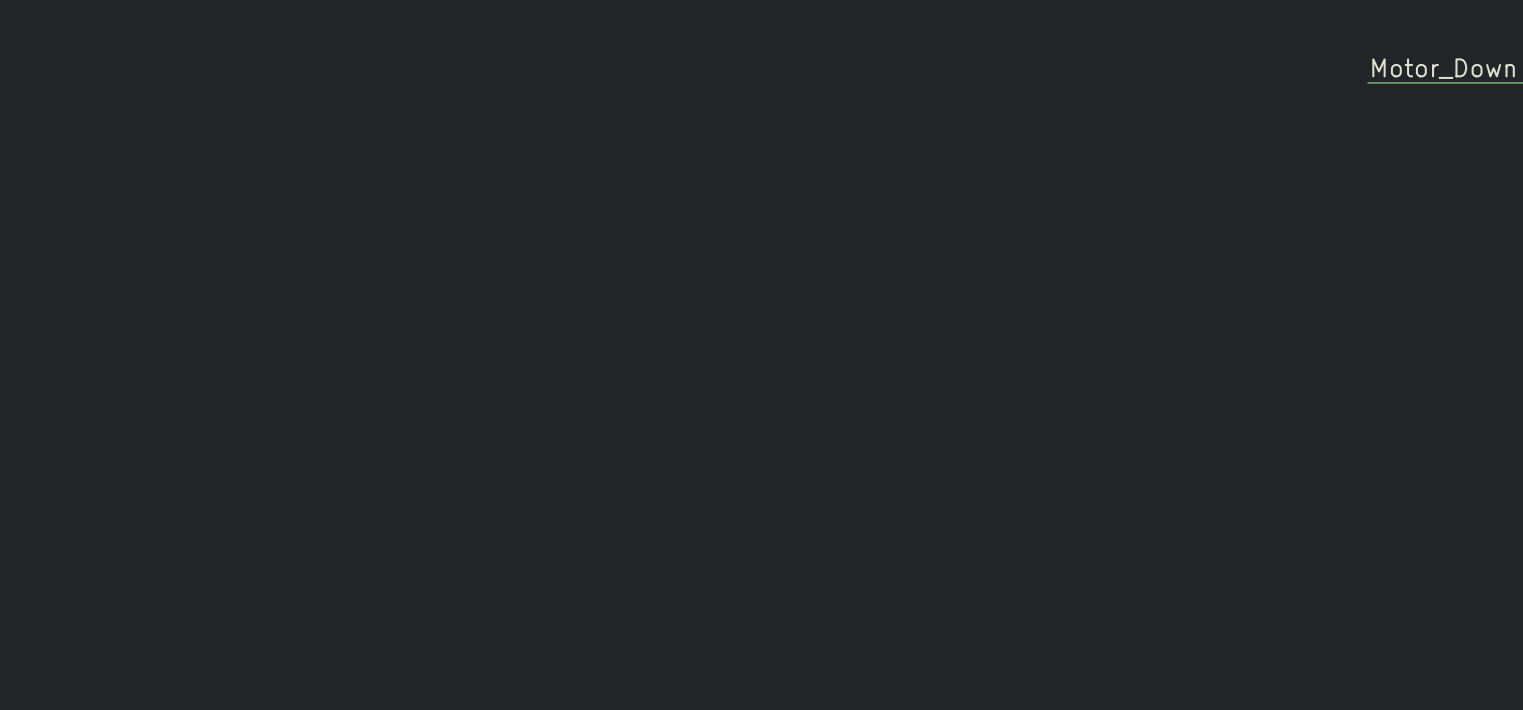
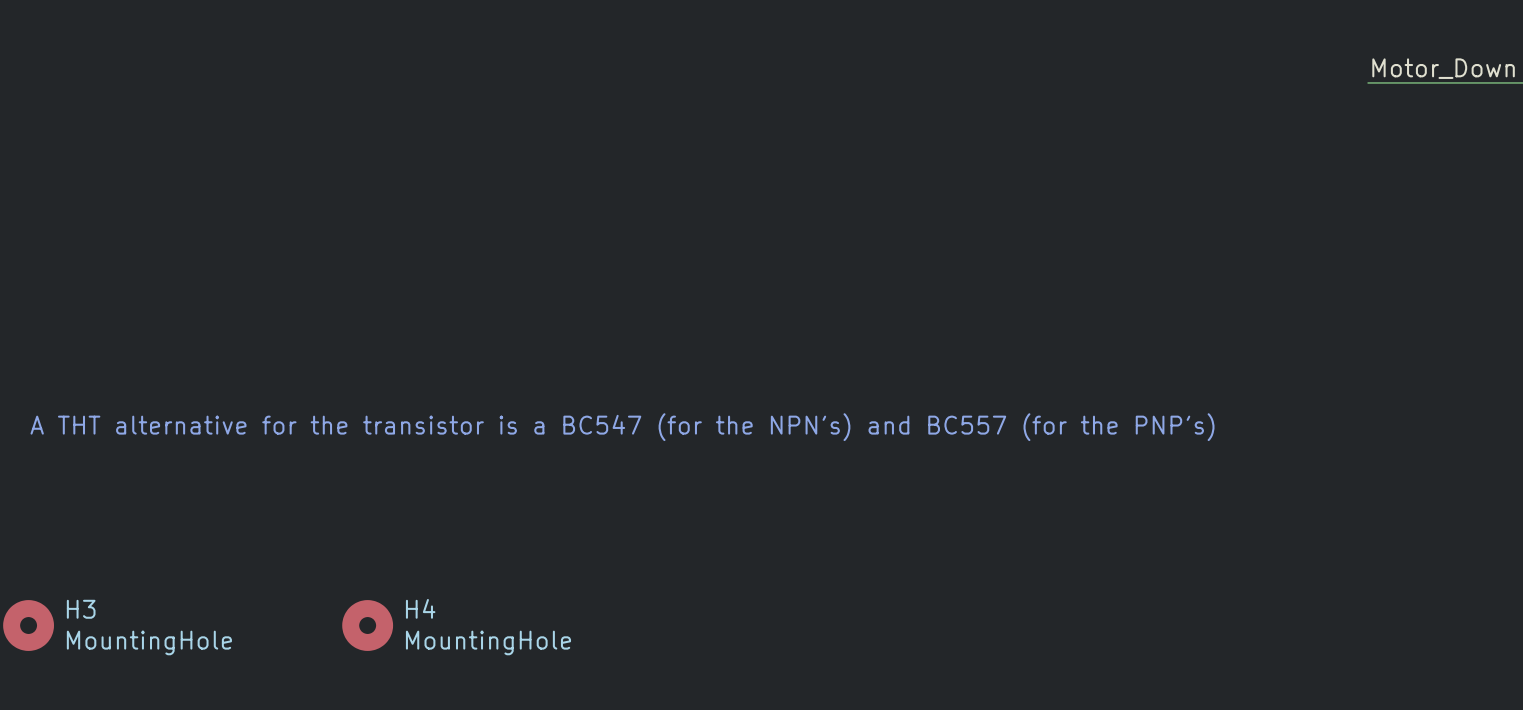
text: none -> A THT alternative for the transistor is a BC547 (for the NPN's) and BC557 (for the PNP's) (622, 427)
H3: none -> MountingHole (28, 625)
H4: none -> MountingHole (367, 625)

